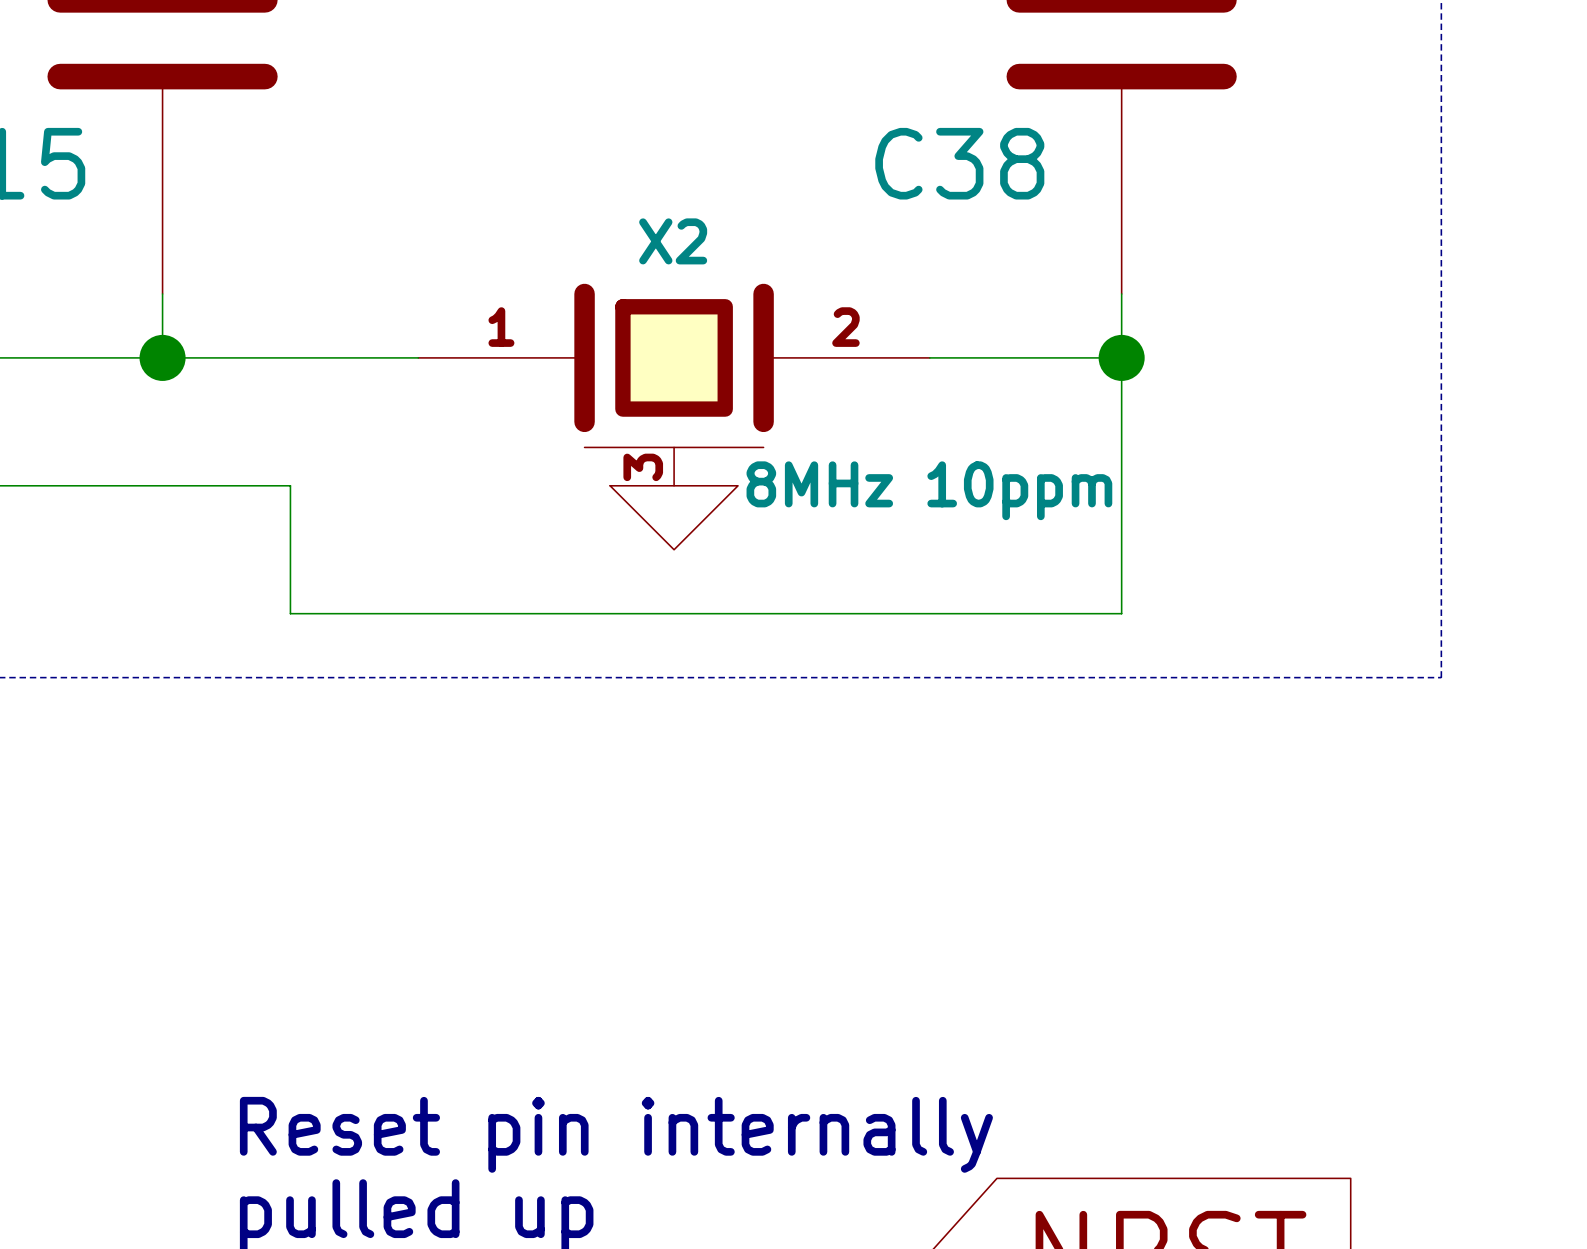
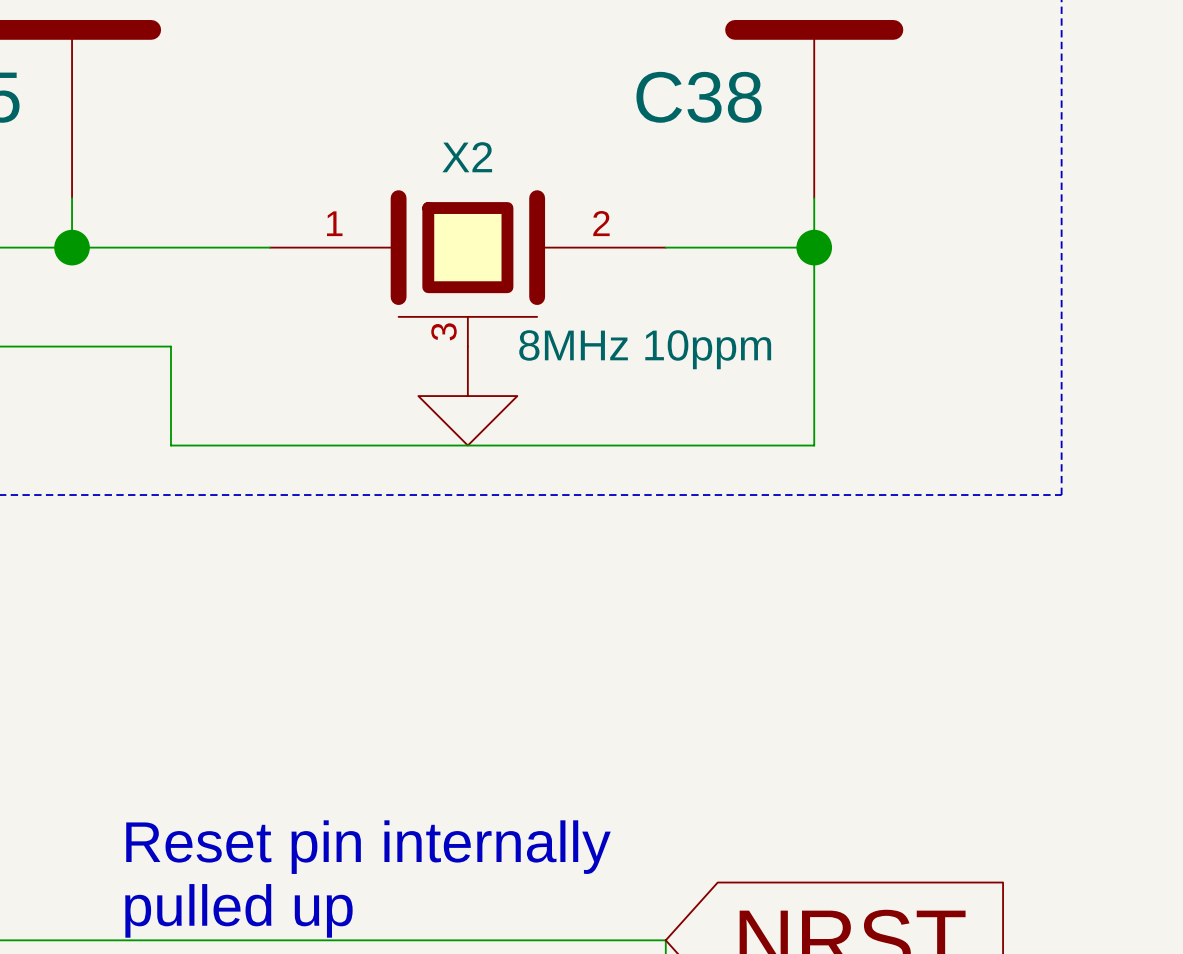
power symbol shape: [610, 485, 739, 550] -> [418, 346, 518, 446]

